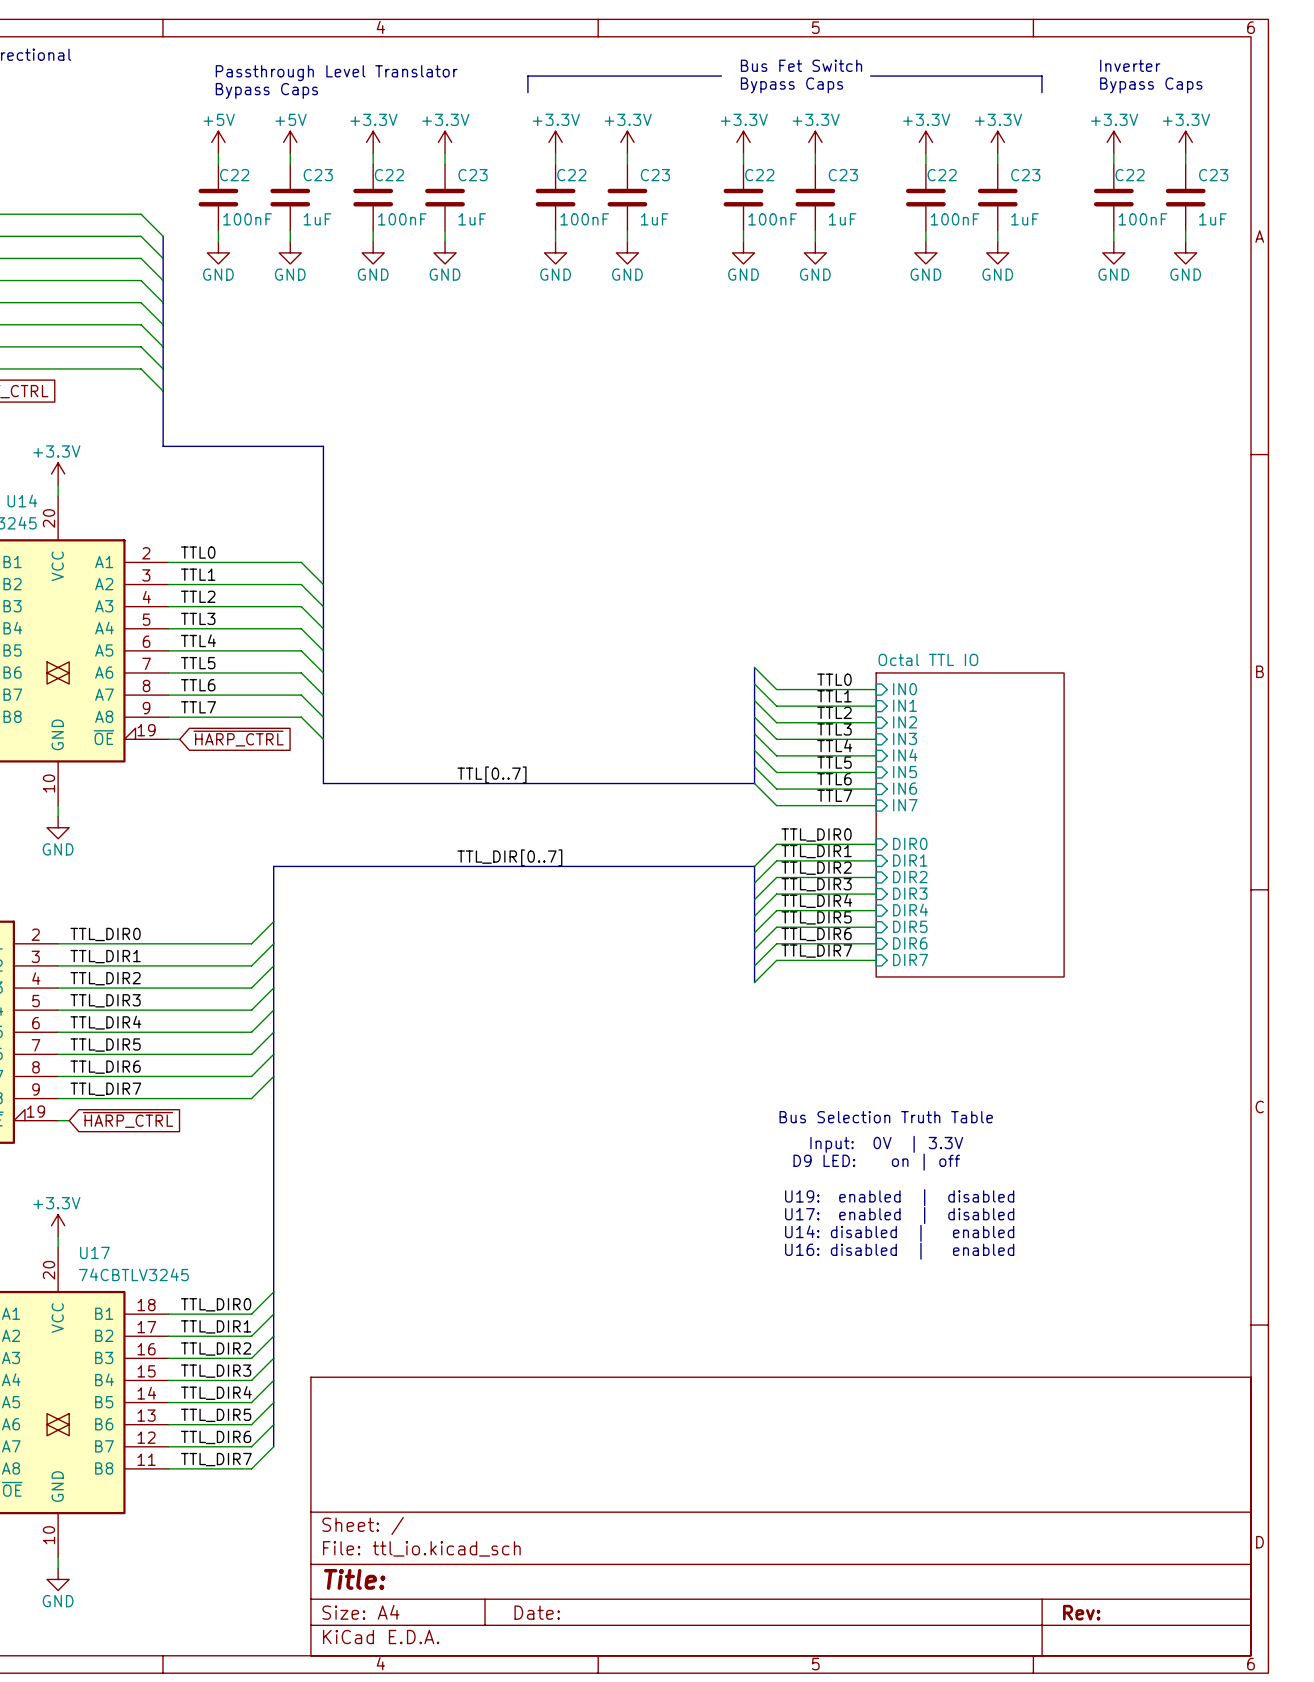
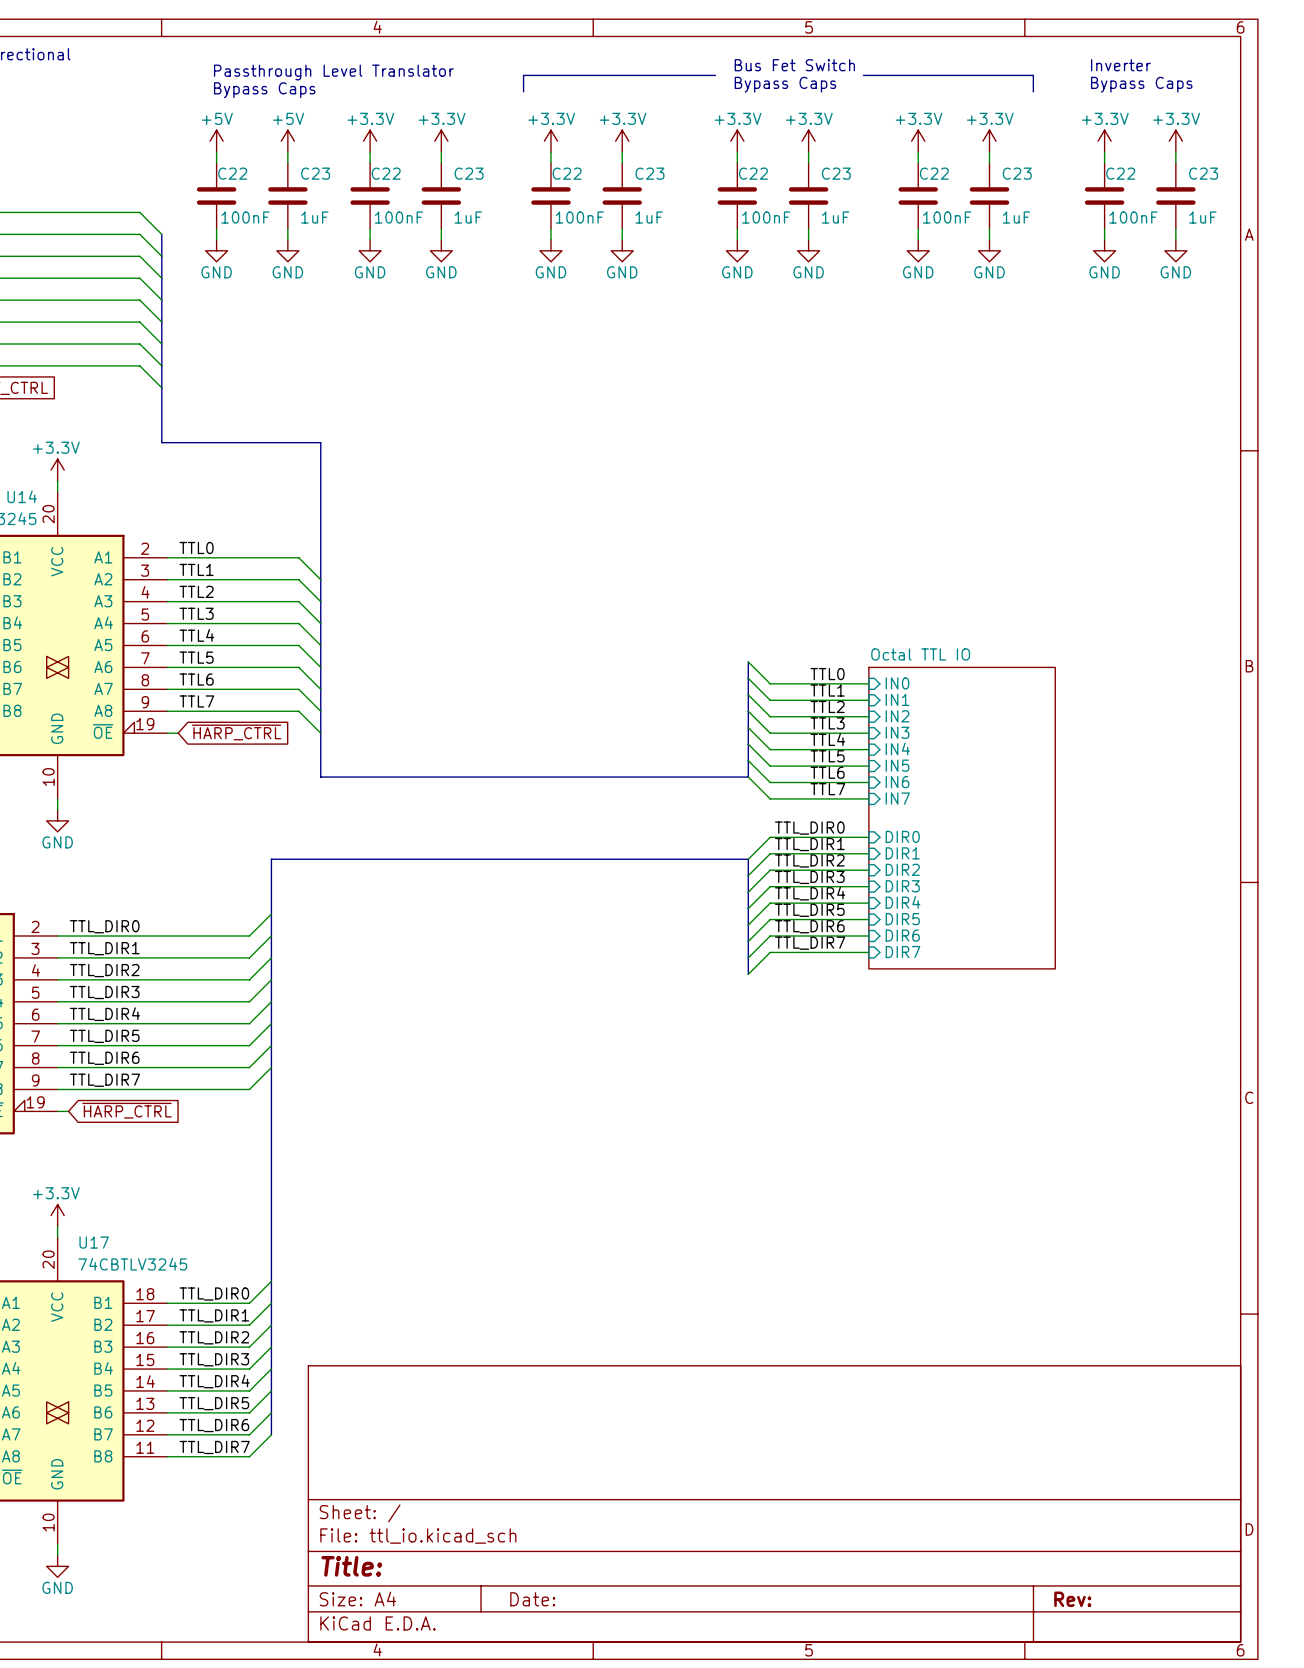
label: TTL[0..7] (491, 774) -> none
label: TTL_DIR[0..7] (509, 857) -> none
text: Bus Selection Truth Table (886, 1117) -> none
text: Input: 0V | 3.3V (886, 1144) -> none
text: D9 LED: on | off (876, 1162) -> none
text: U19: enabled | disabled (899, 1197) -> none
text: U17: enabled | disabled (899, 1215) -> none
text: U14: disabled | enabled (899, 1233) -> none
text: U16: disabled | enabled (899, 1251) -> none

